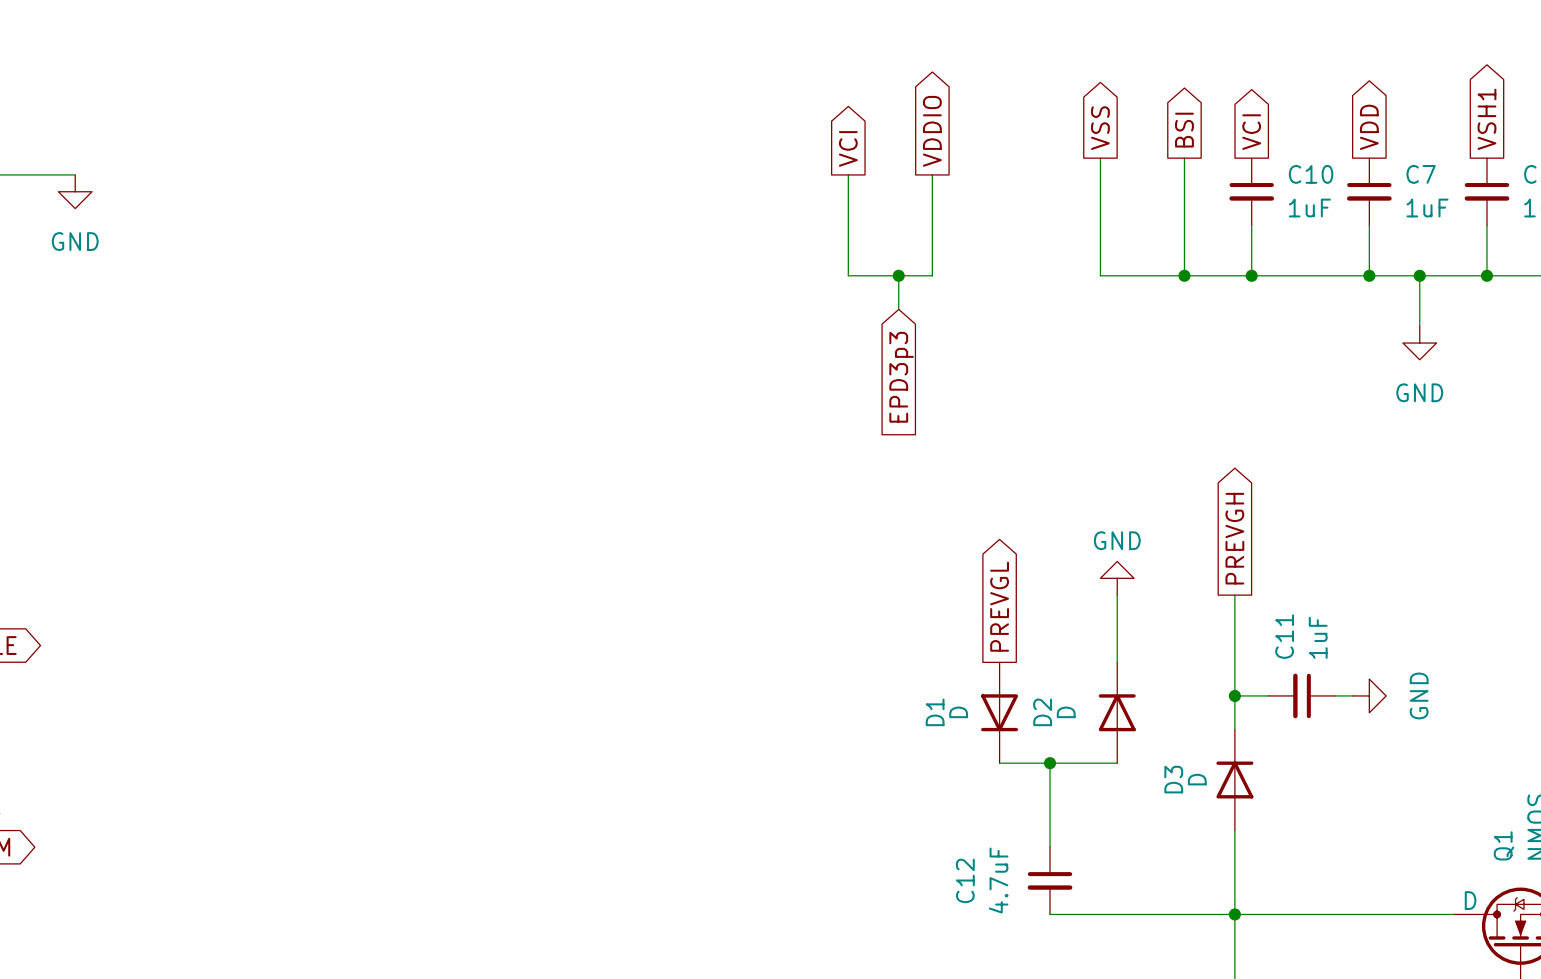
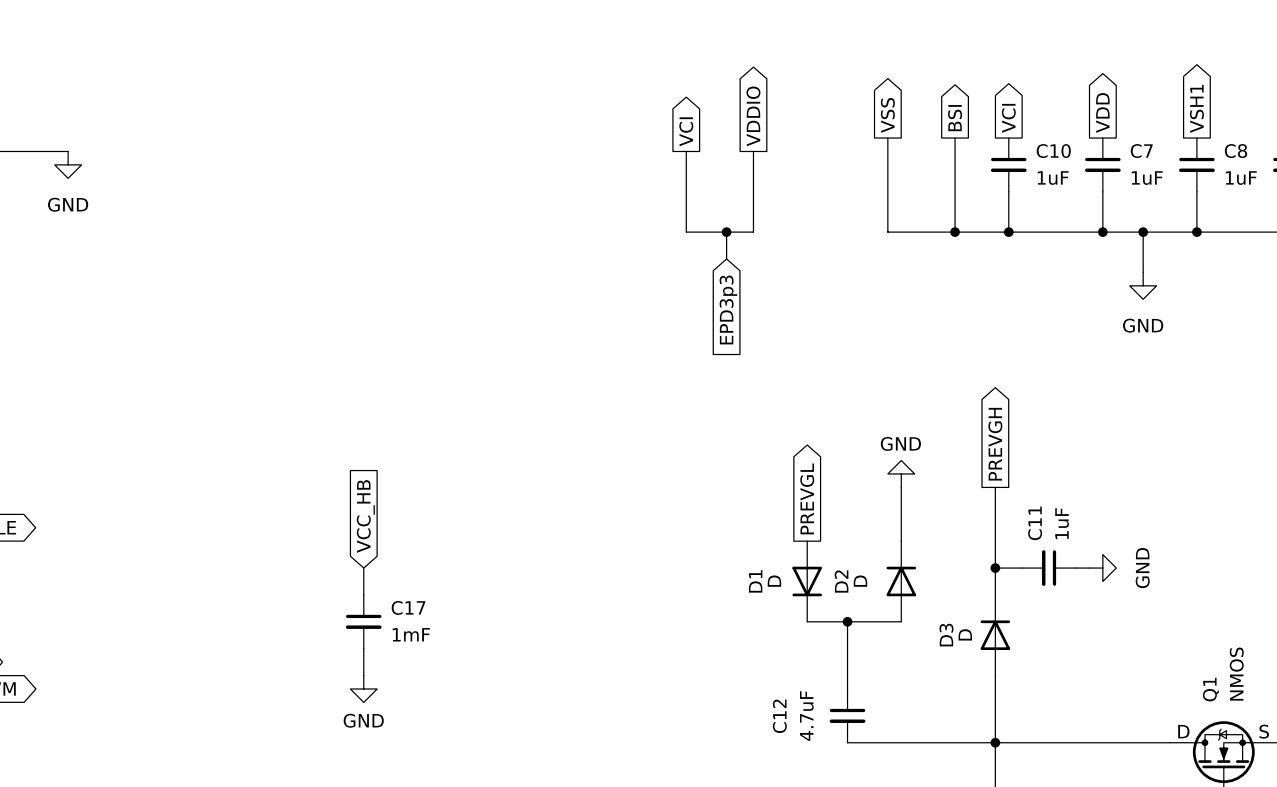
global label: none -> VCC_HB (365, 516)
wire: none -> (363, 568) (363, 594)
C17: none -> 1mF (363, 621)
wire: none -> (363, 648) (363, 675)
power symbol: none -> GND (363, 688)

